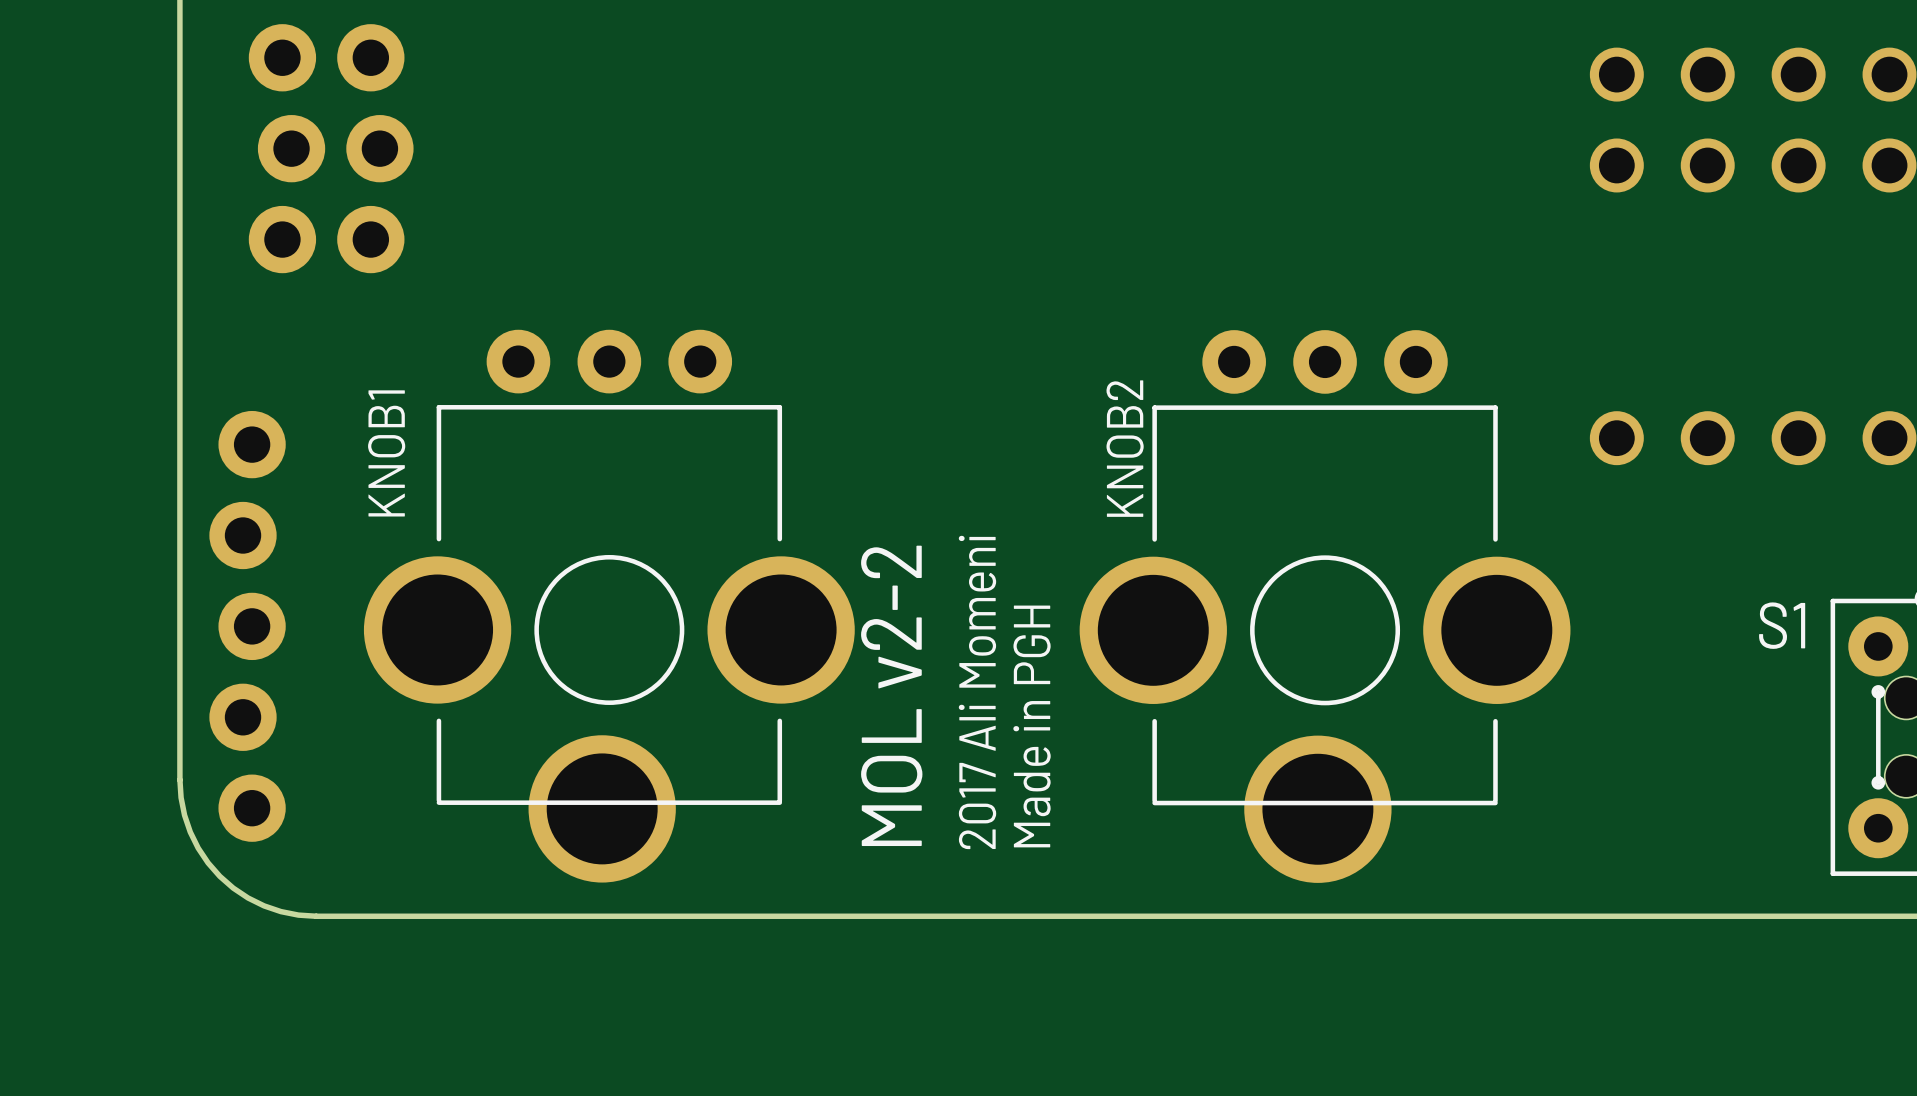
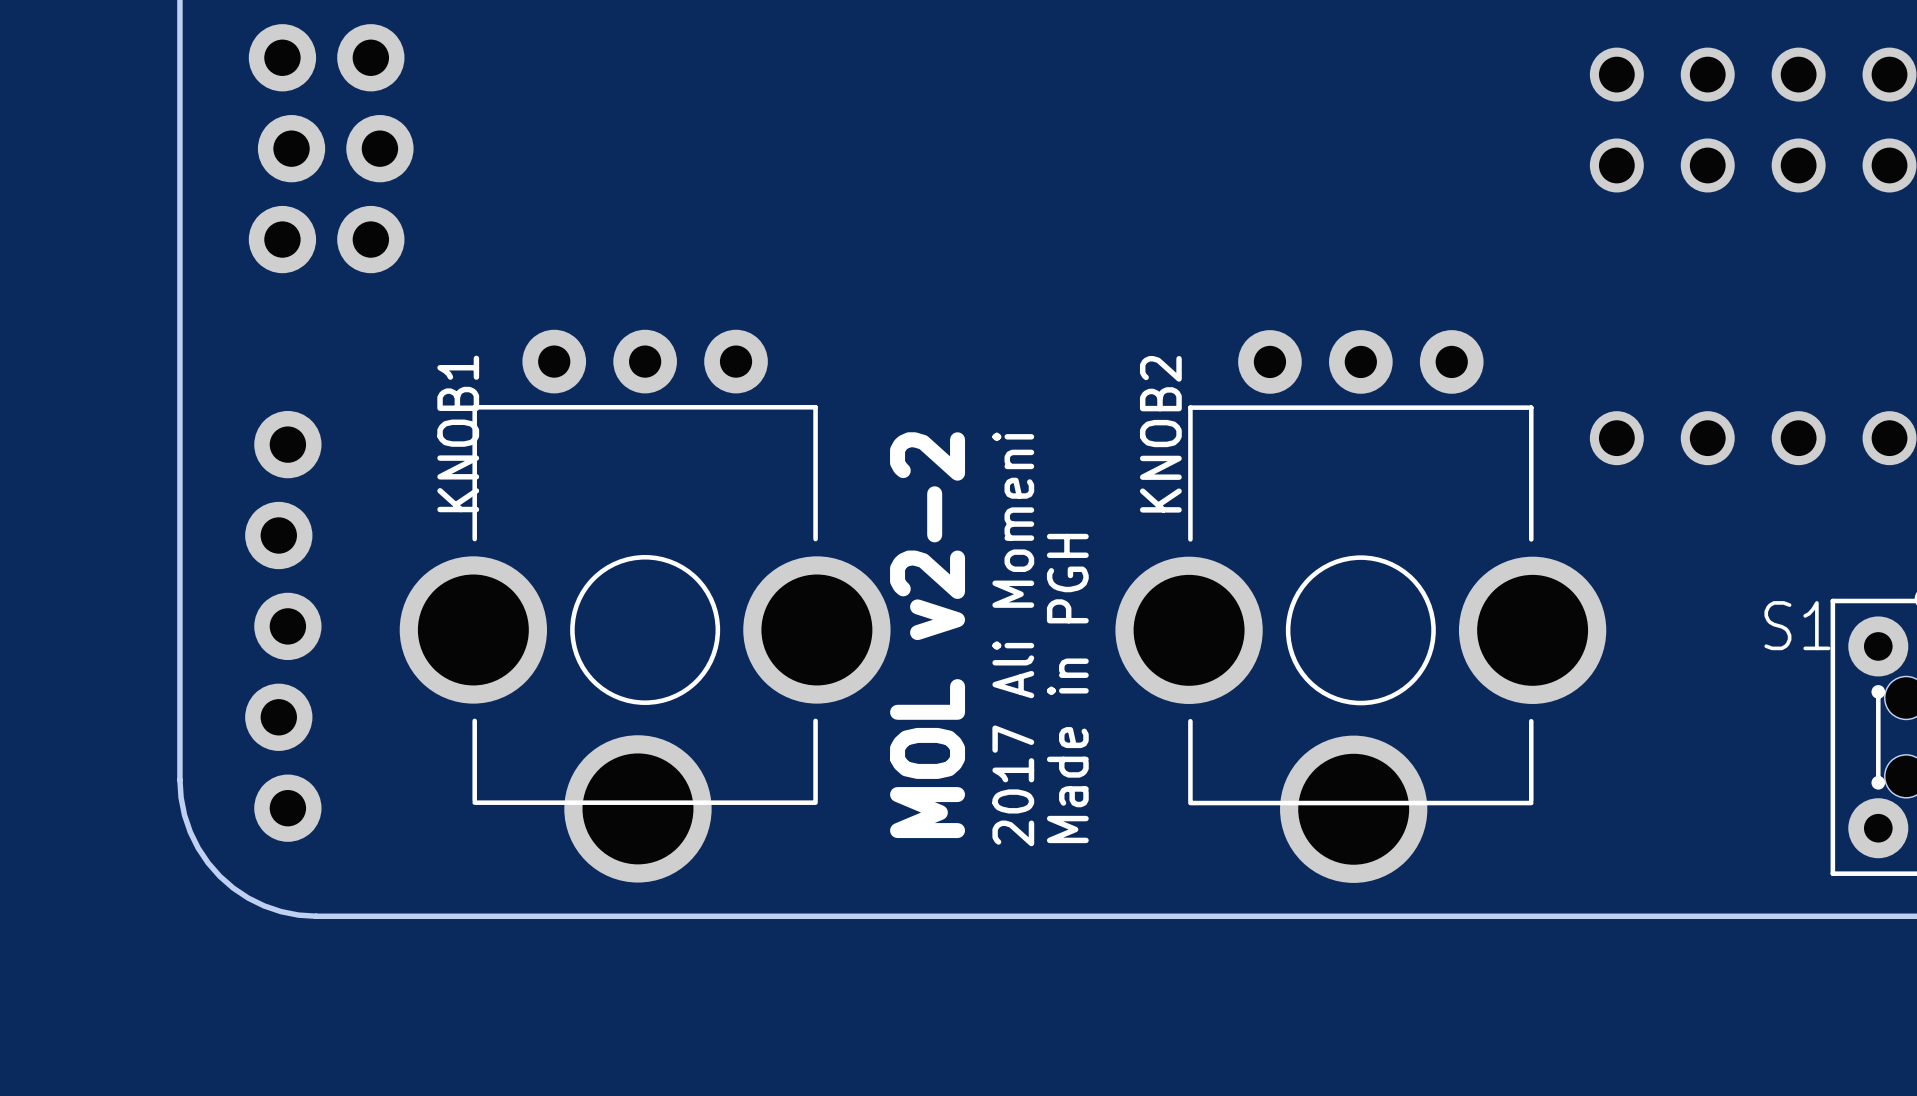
KNOB1 name position: KNOB1 (386, 453) -> KNOB1 (458, 433)
KNOB1 position: (609, 606) -> (645, 606)
KNOB2 position: (1325, 606) -> (1360, 606)
part position: (247, 626) -> (283, 626)
text position: 2017 Ali Momeni (977, 692) -> 2017 Ali Momeni (1013, 639)
text position: MOL v2-2 (891, 695) -> MOL v2-2 (927, 635)
text position: Made in PGH (1032, 726) -> Made in PGH (1067, 688)

